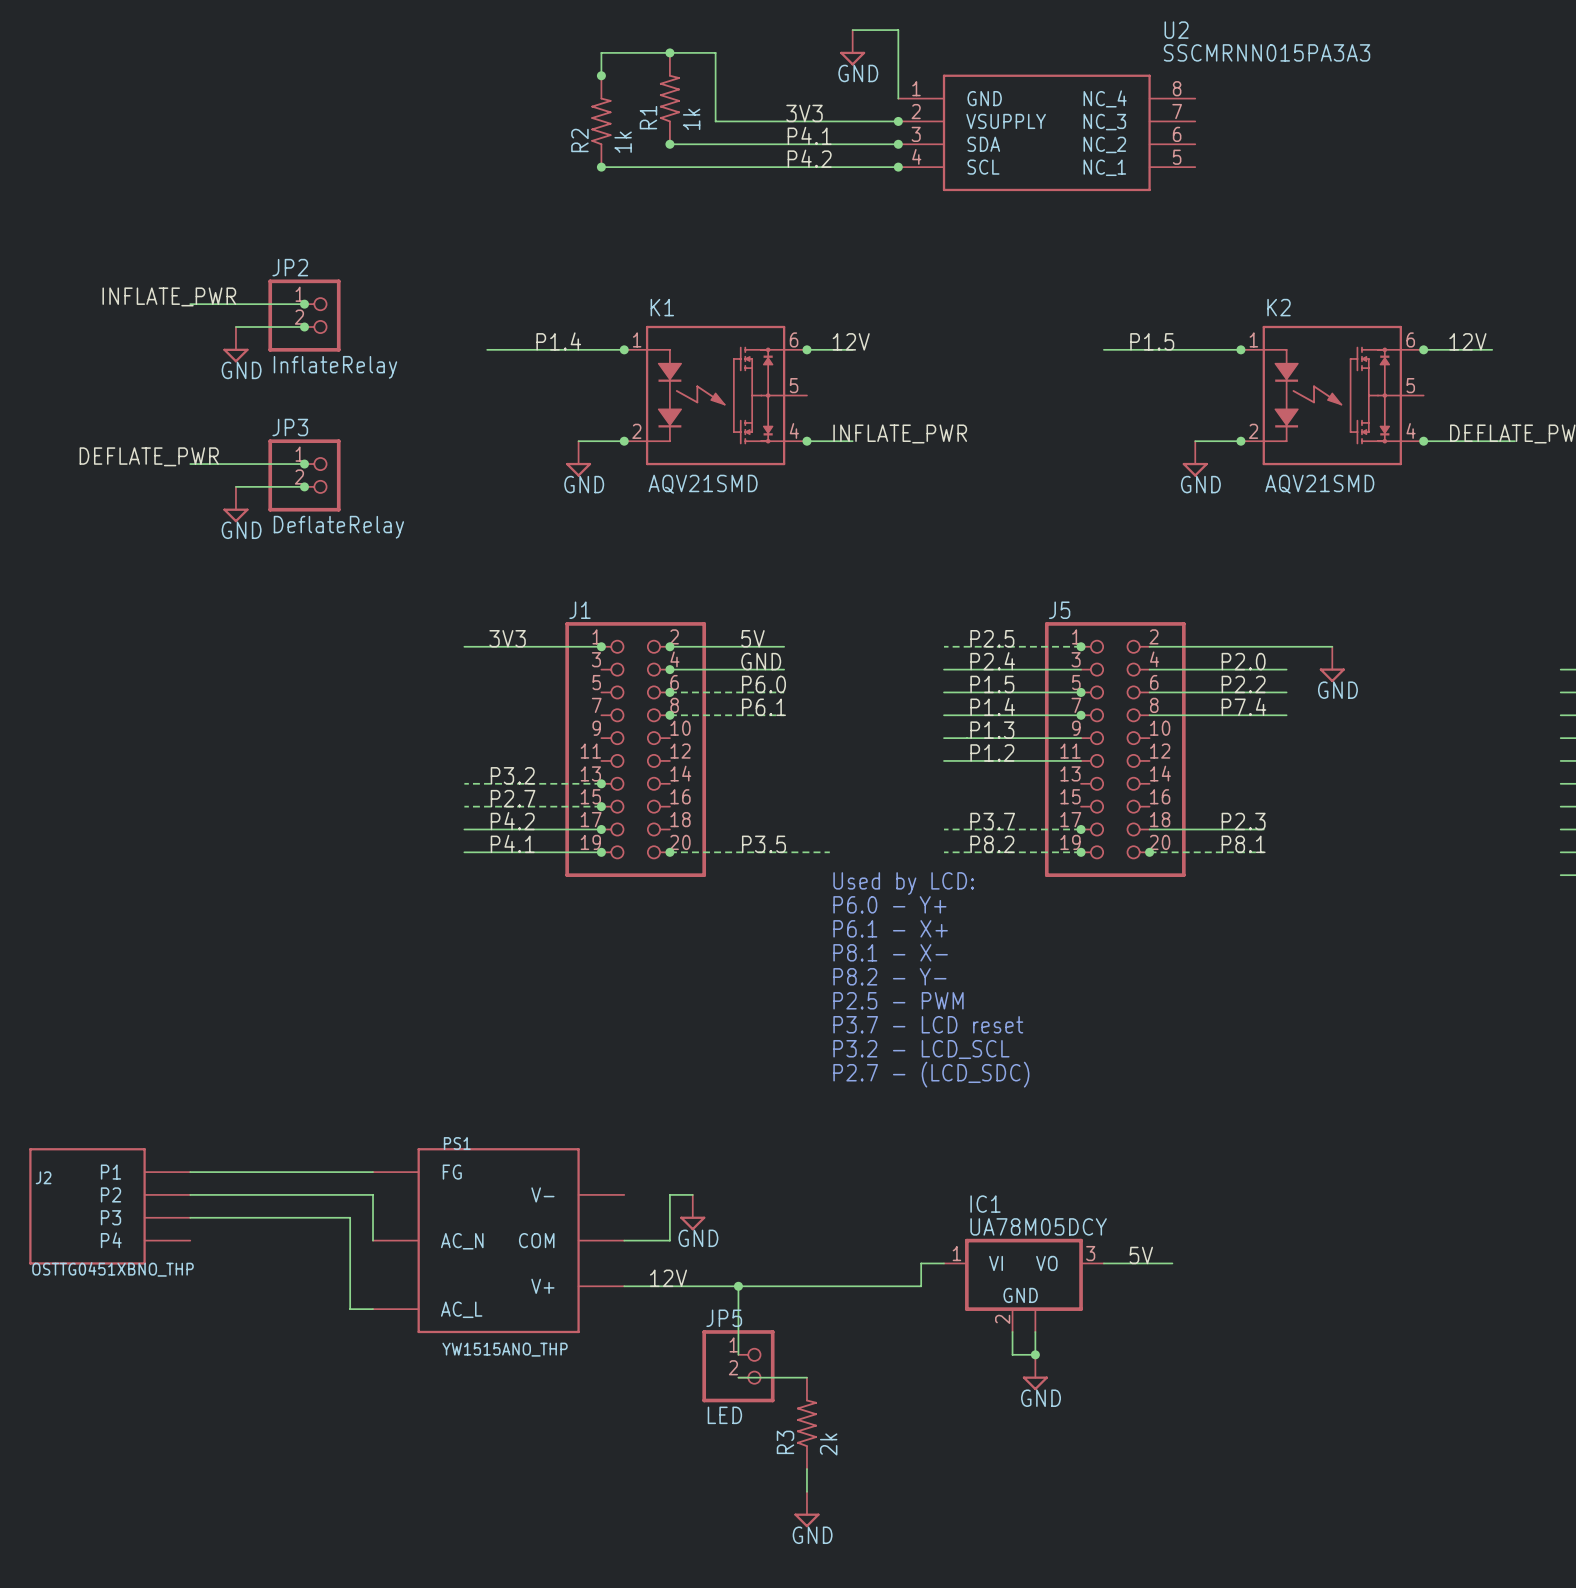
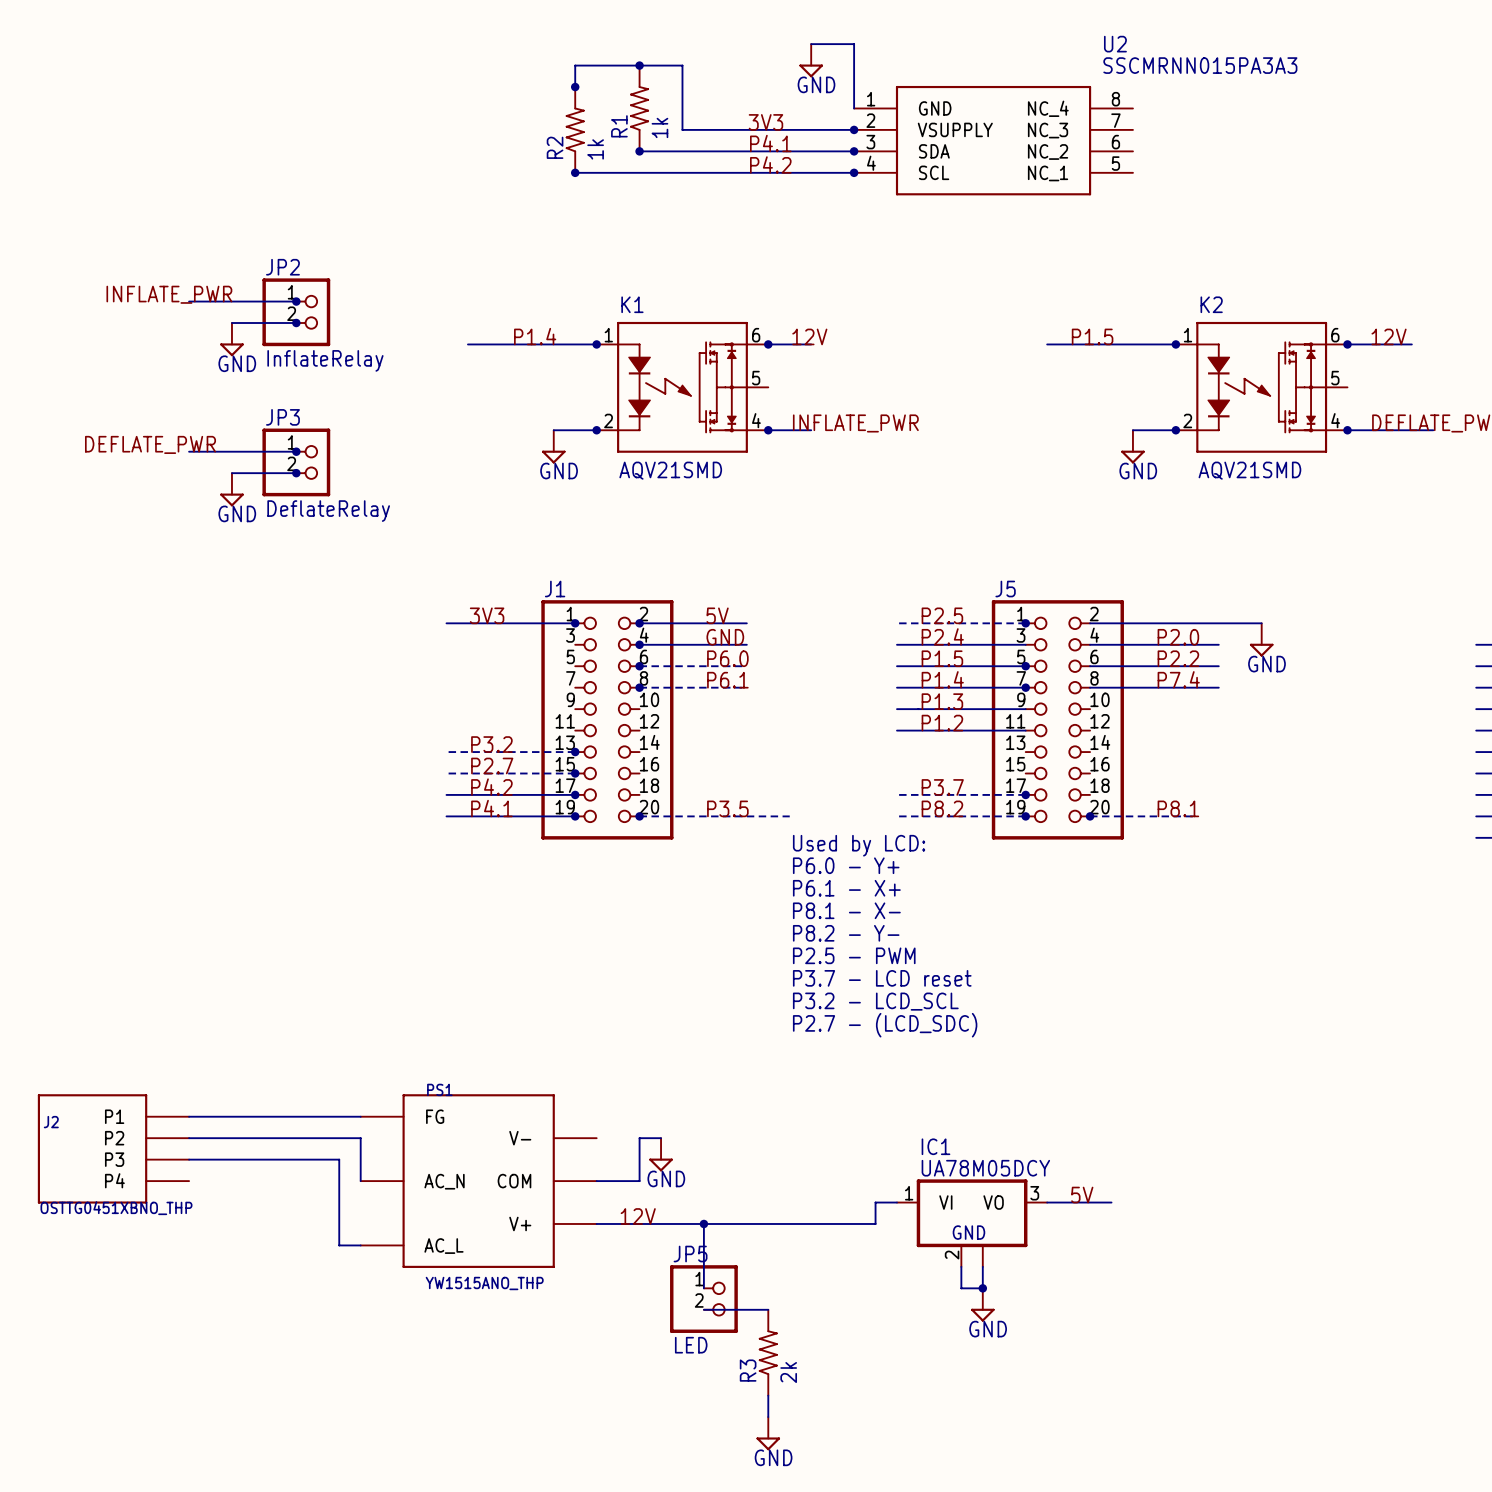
label: P2.3 (1243, 821) -> none
wire: (1149, 829) (1263, 829) -> none

